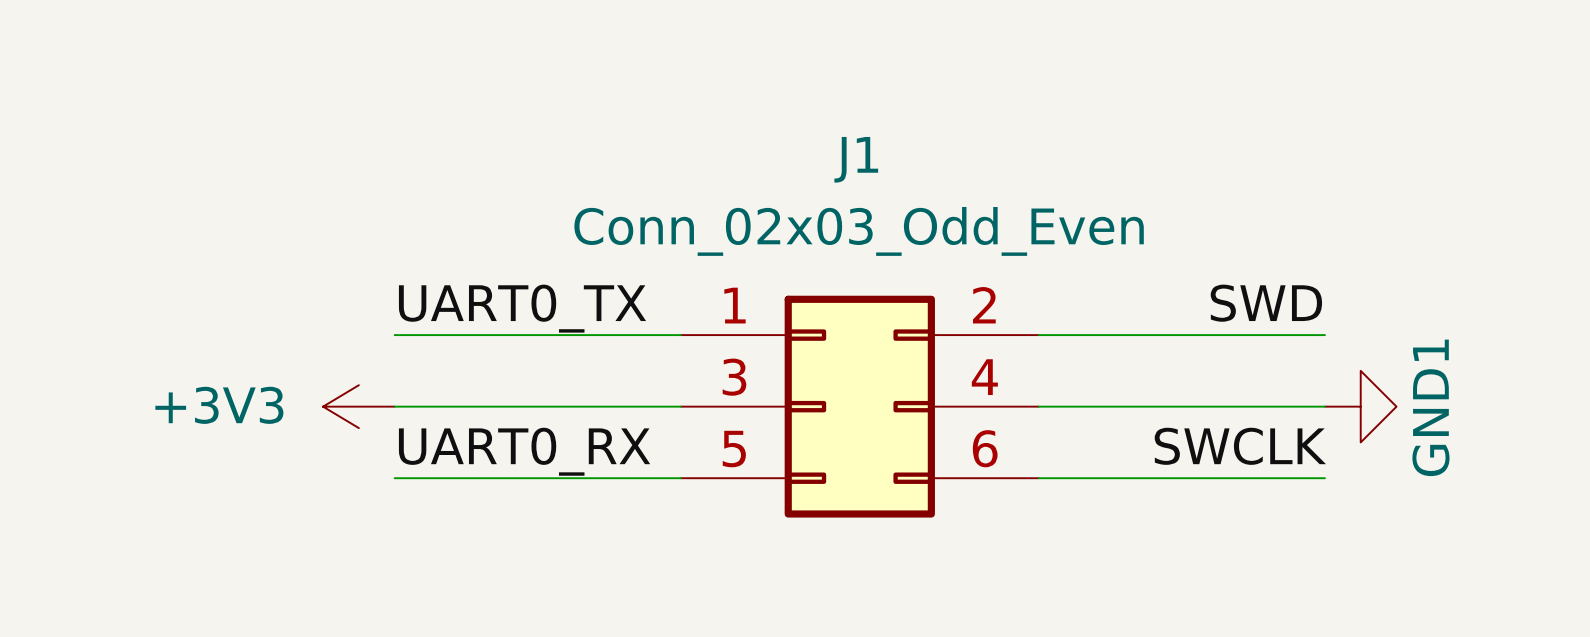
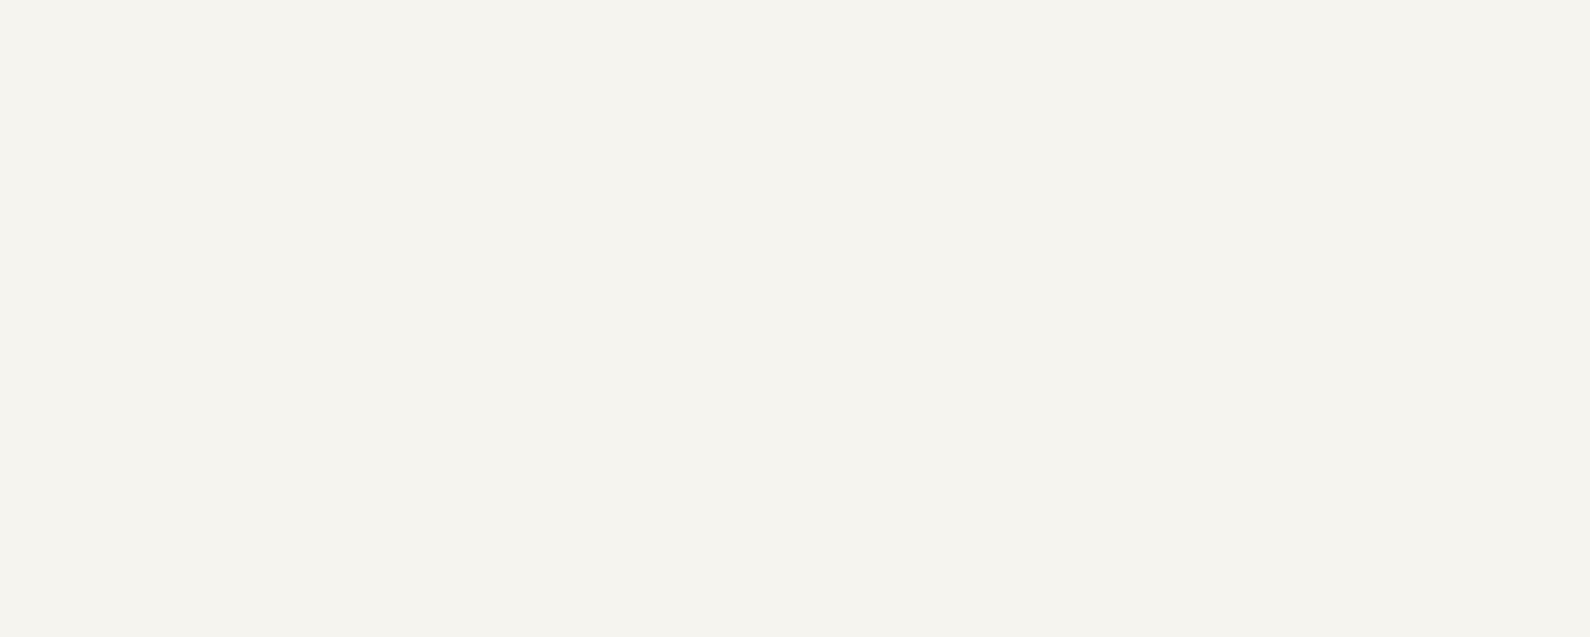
label: SWD (1266, 303) -> none
label: UART0_TX (522, 308) -> none
wire: (394, 335) (680, 335) -> none
wire: (1038, 335) (1324, 335) -> none
power symbol: +3V3 (358, 406) -> none
wire: (394, 406) (680, 406) -> none
J1: Conn_02x03_Odd_Even (859, 406) -> none
wire: (1038, 406) (1324, 406) -> none
power symbol: GND1 (1360, 406) -> none
label: SWCLK (1240, 446) -> none
label: UART0_RX (524, 451) -> none
wire: (394, 478) (680, 478) -> none
wire: (1038, 478) (1324, 478) -> none

